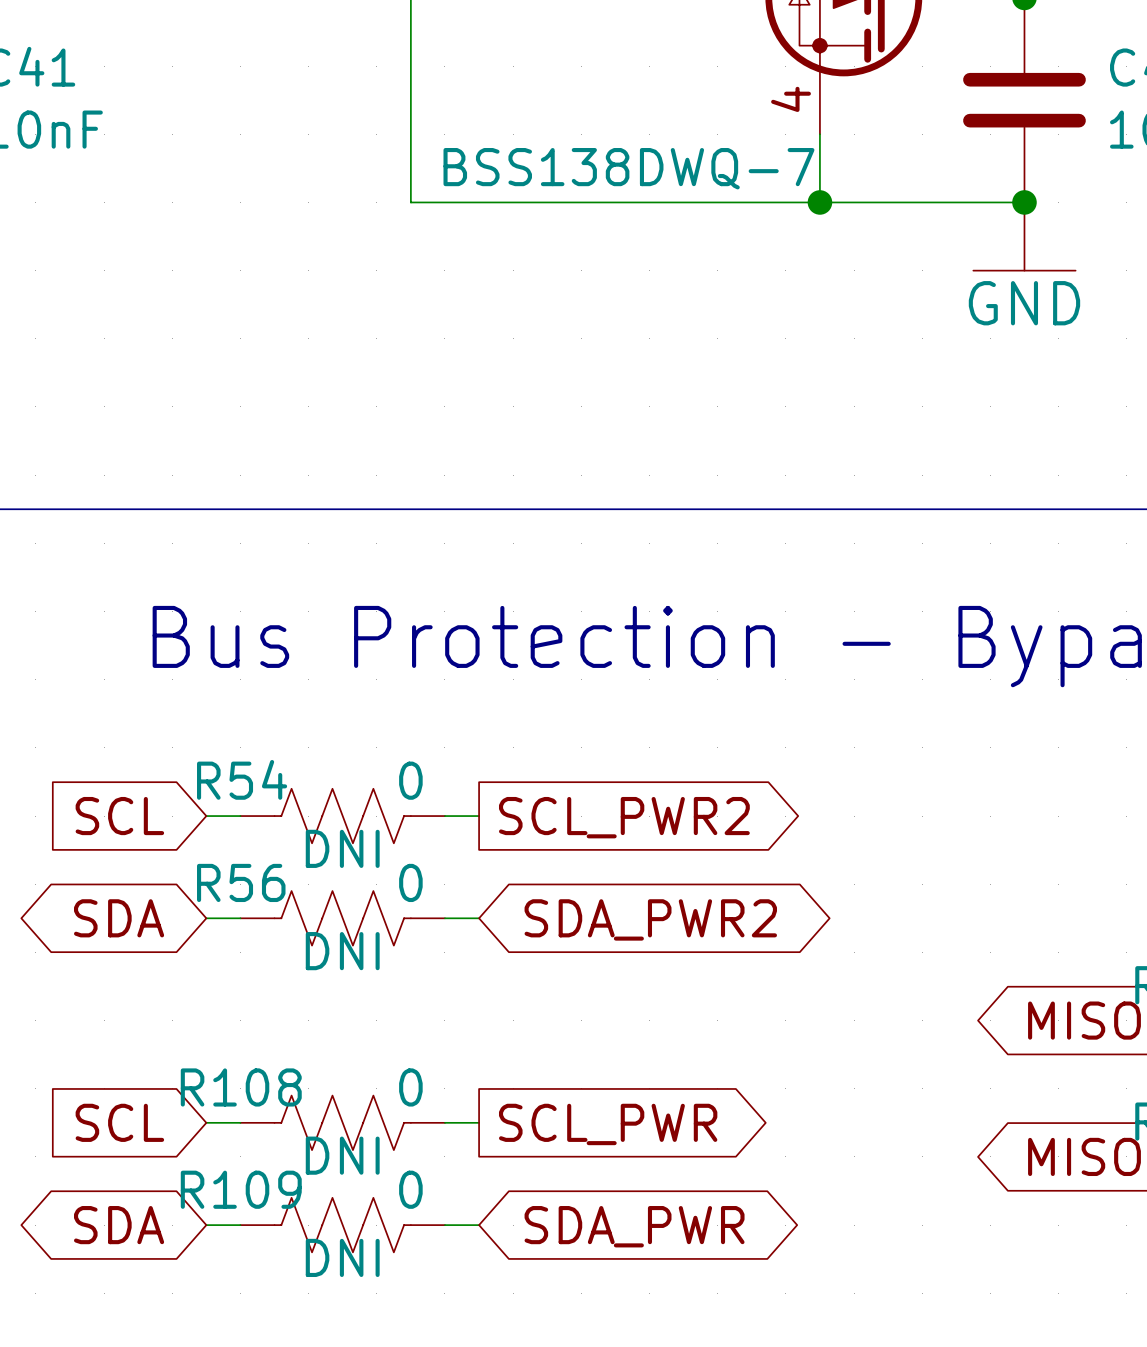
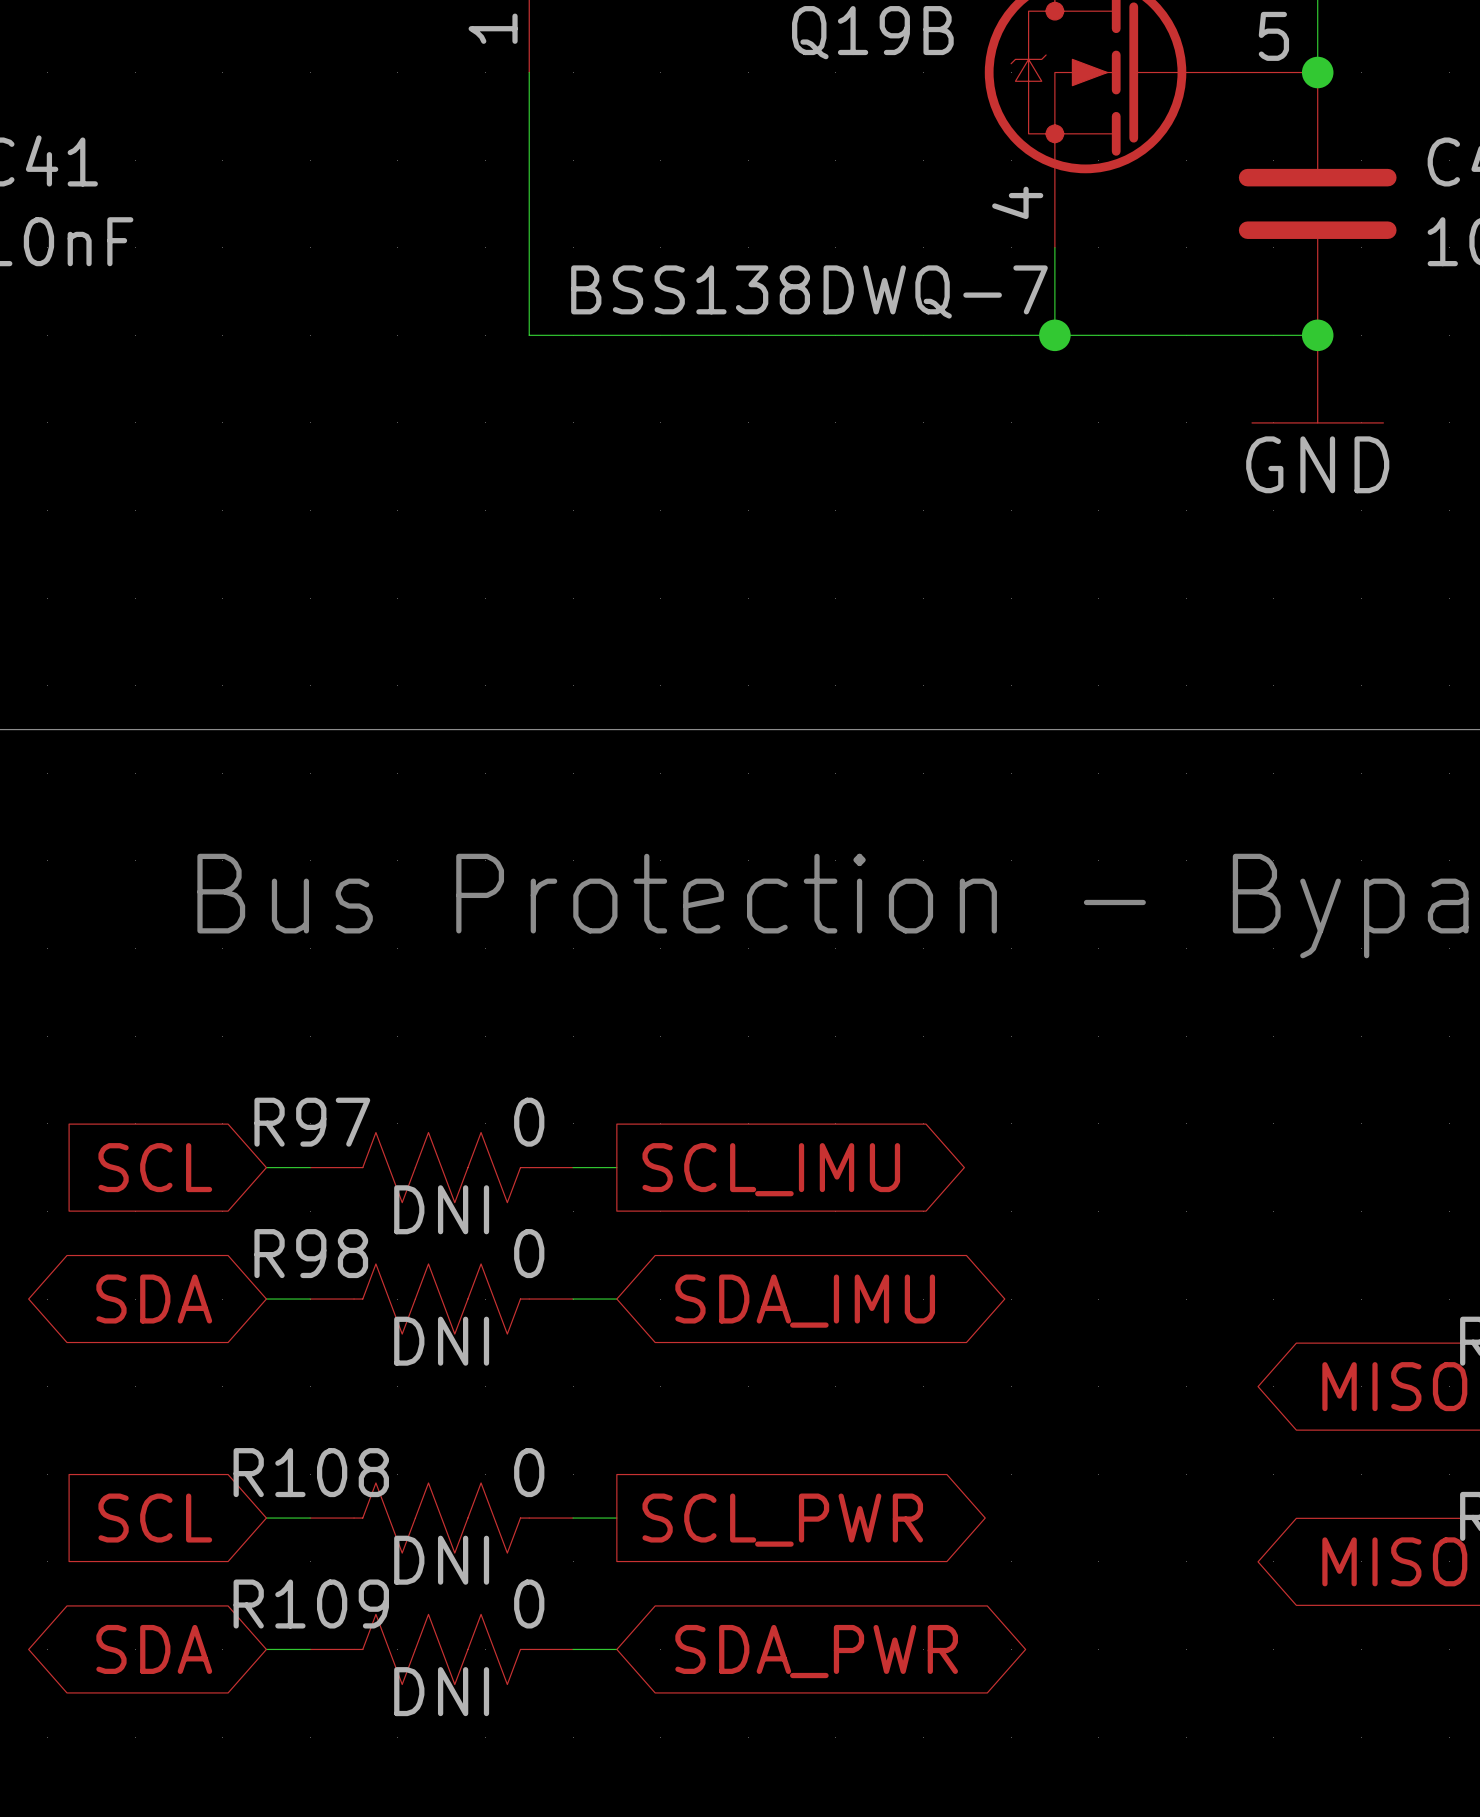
global label position: SCL (119, 816) -> SCL (155, 1167)
wire: (206, 816) (240, 816) -> (266, 1167) (310, 1167)
R54: 0 (342, 816) -> none
wire: (444, 816) (479, 816) -> (573, 1167) (616, 1167)
global label: SCL_PWR2 (624, 817) -> none
R97: none -> 0 (441, 1167)
global label: none -> SCL_IMU (771, 1169)
global label position: SDA (119, 918) -> SDA (154, 1299)
wire: (206, 918) (240, 918) -> (266, 1299) (310, 1299)
R56: 0 (342, 918) -> none
wire: (444, 918) (479, 918) -> (573, 1299) (616, 1299)
global label: SDA_PWR2 (650, 919) -> none
R98: none -> 0 (441, 1299)
global label: none -> SDA_IMU (805, 1301)

